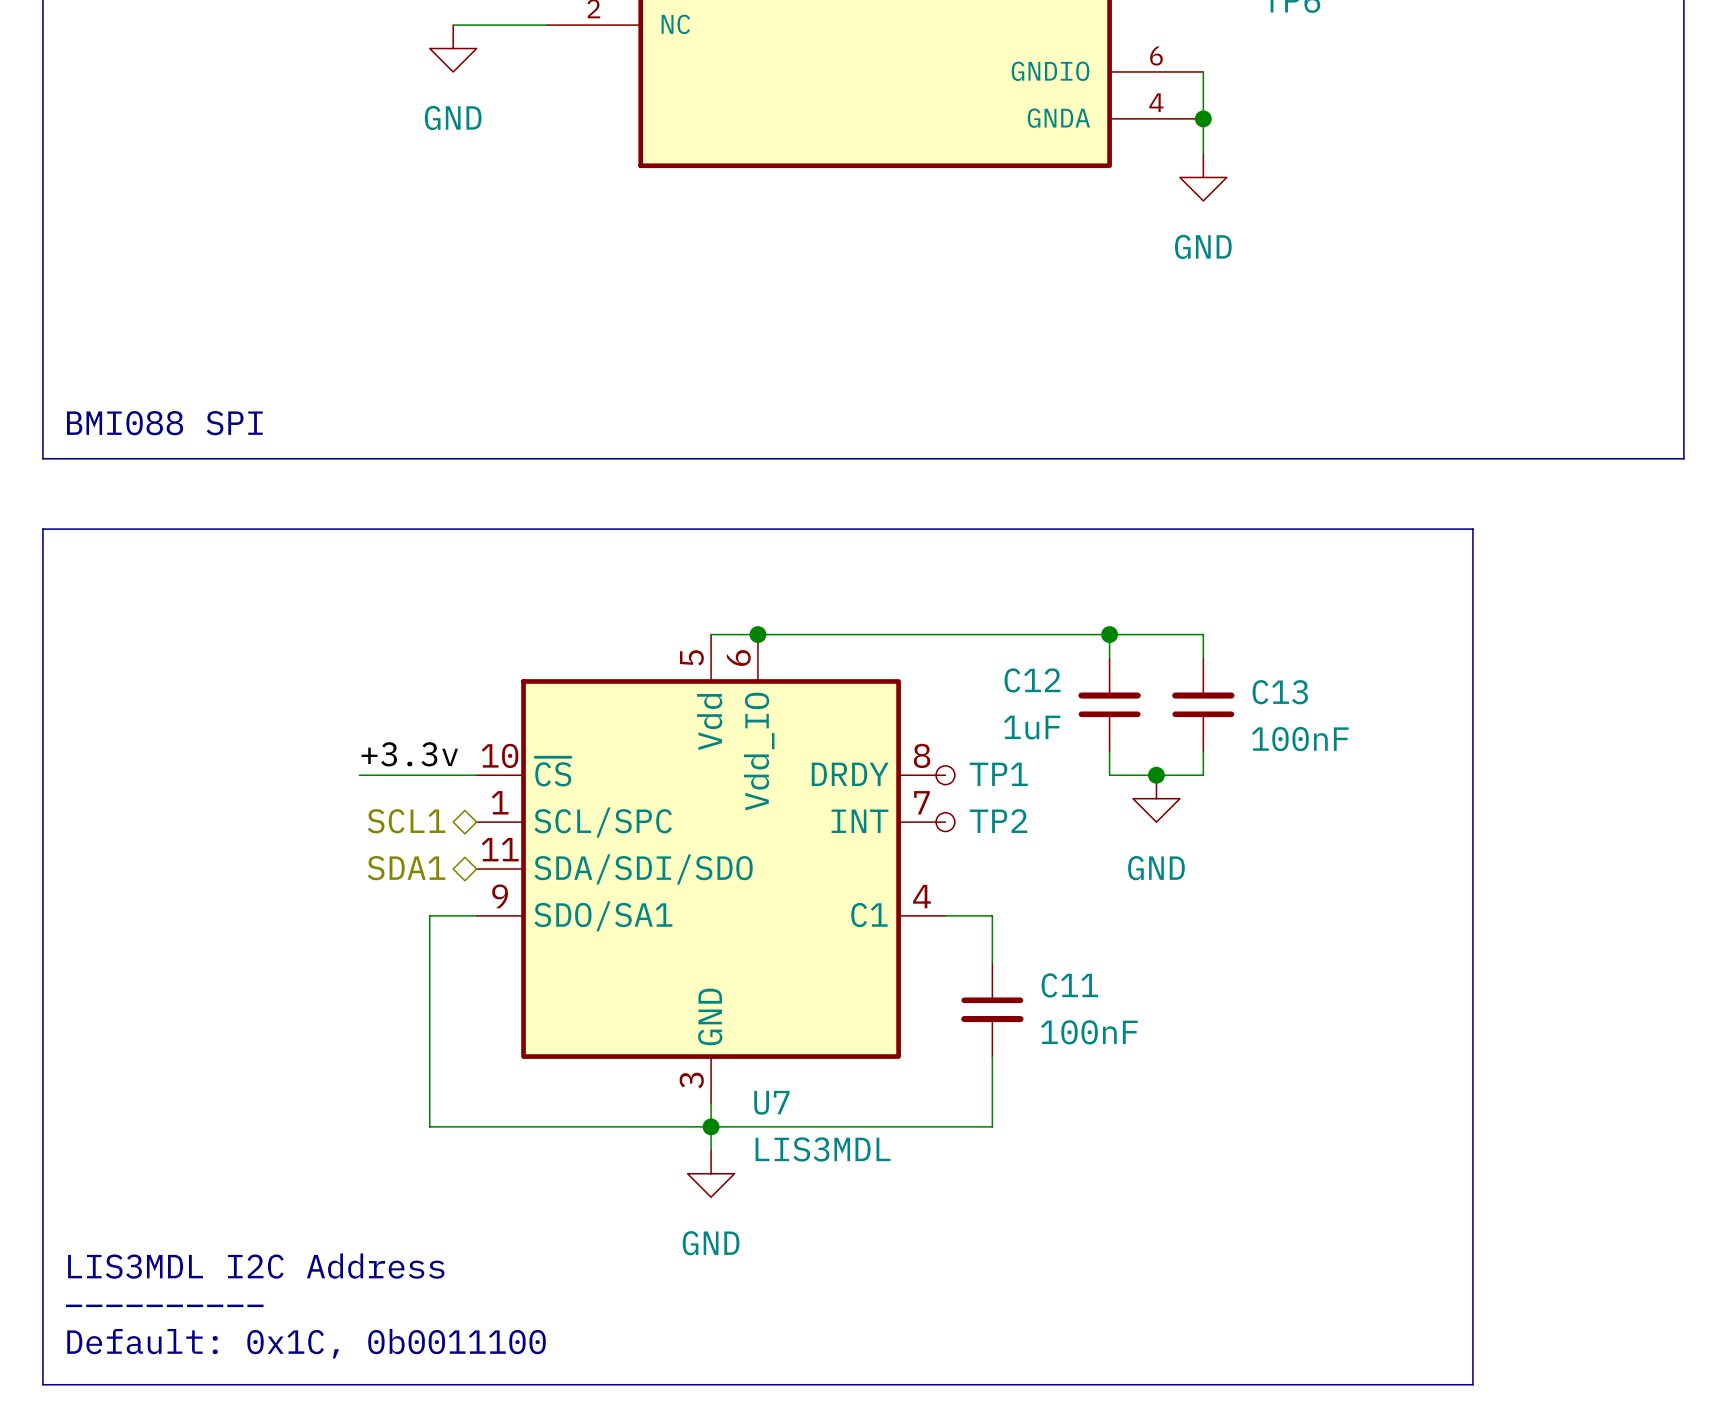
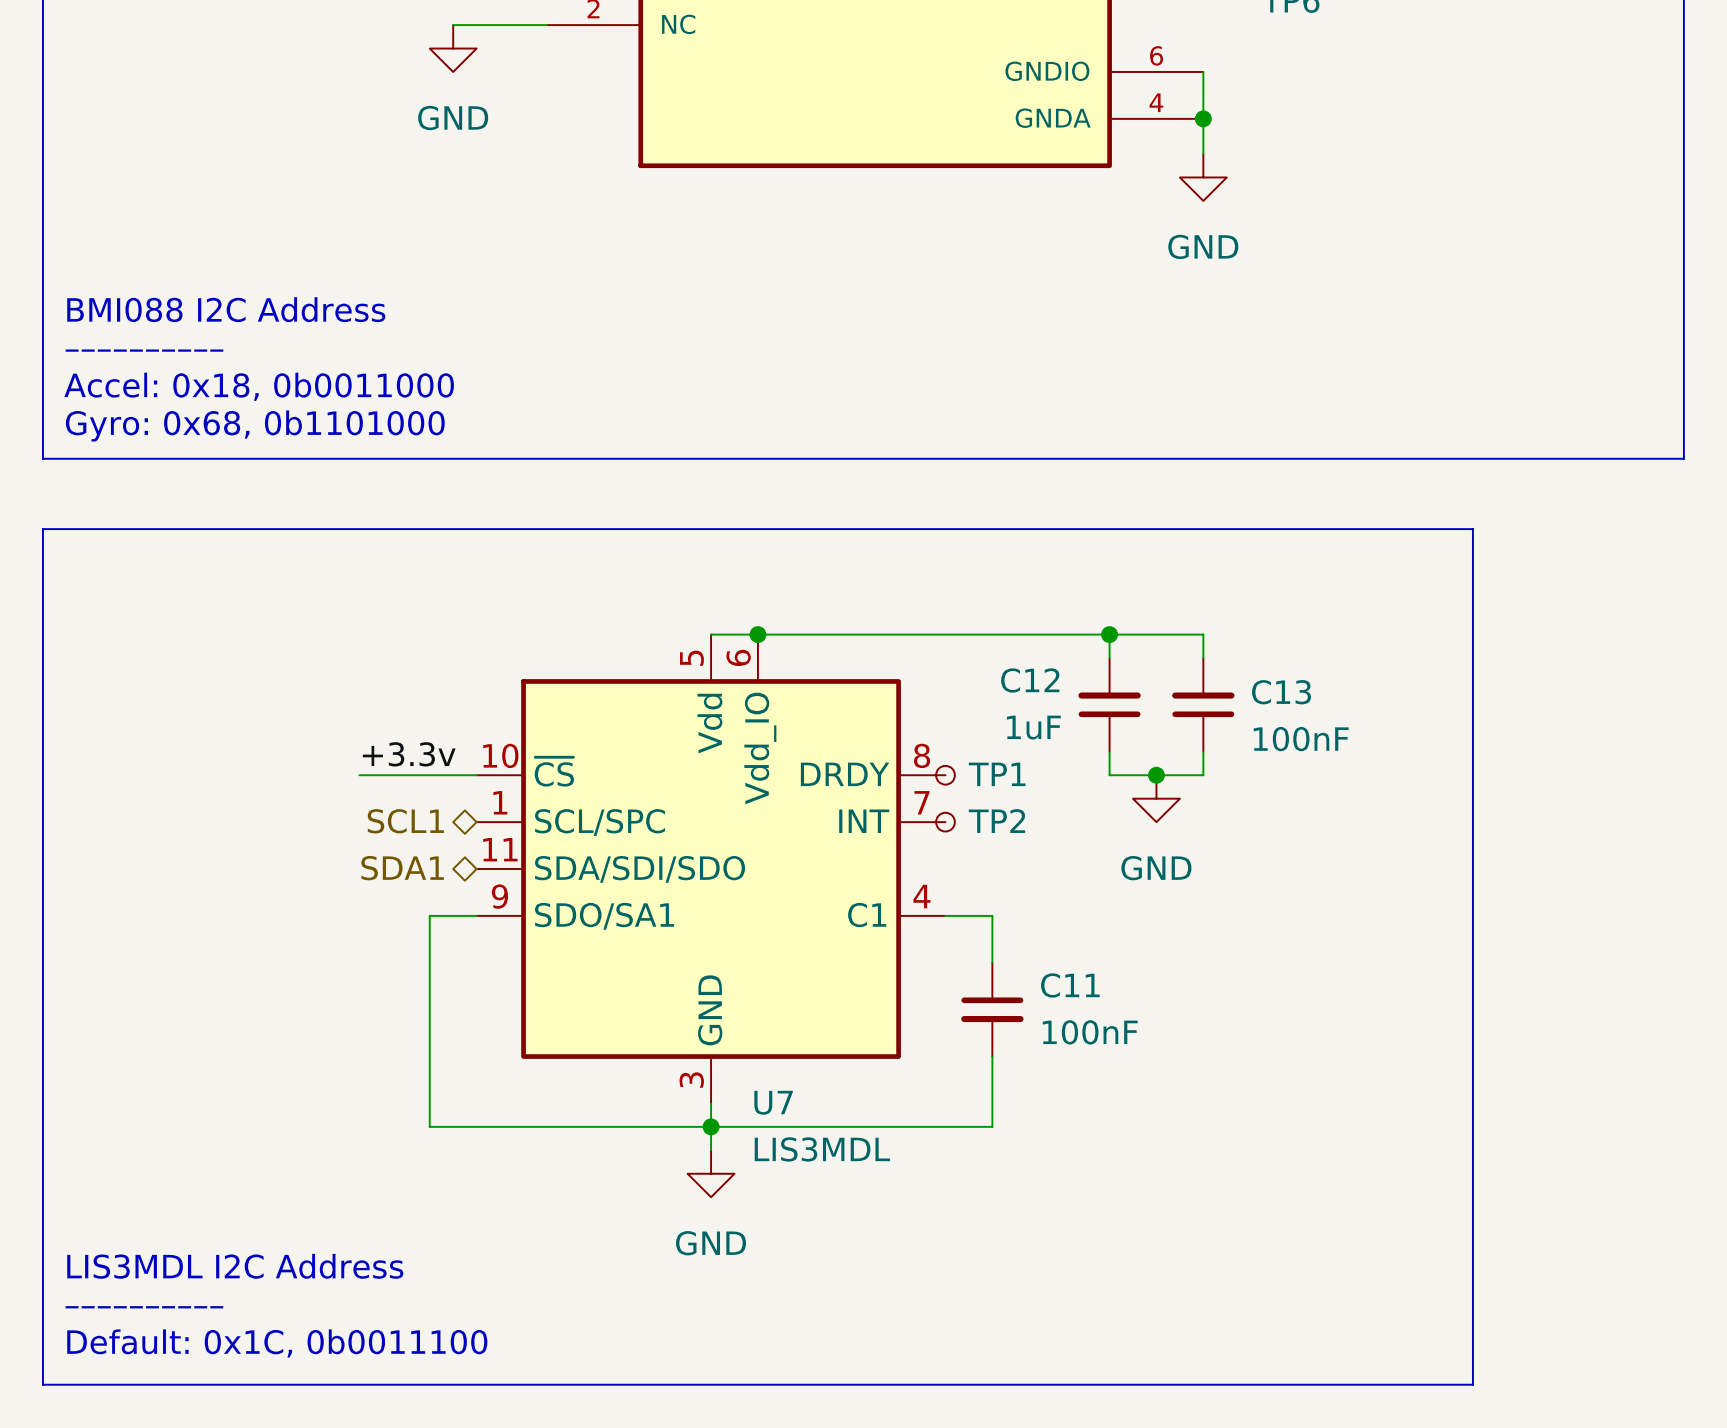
text: none -> BMI088 I2C Address (226, 309)
text: none -> –––––––––– (144, 350)
text: none -> Accel: 0x18, 0b0011000 (259, 386)
text: BMI088 SPI (164, 423) -> Gyro: 0x68, 0b1101000 (255, 426)

